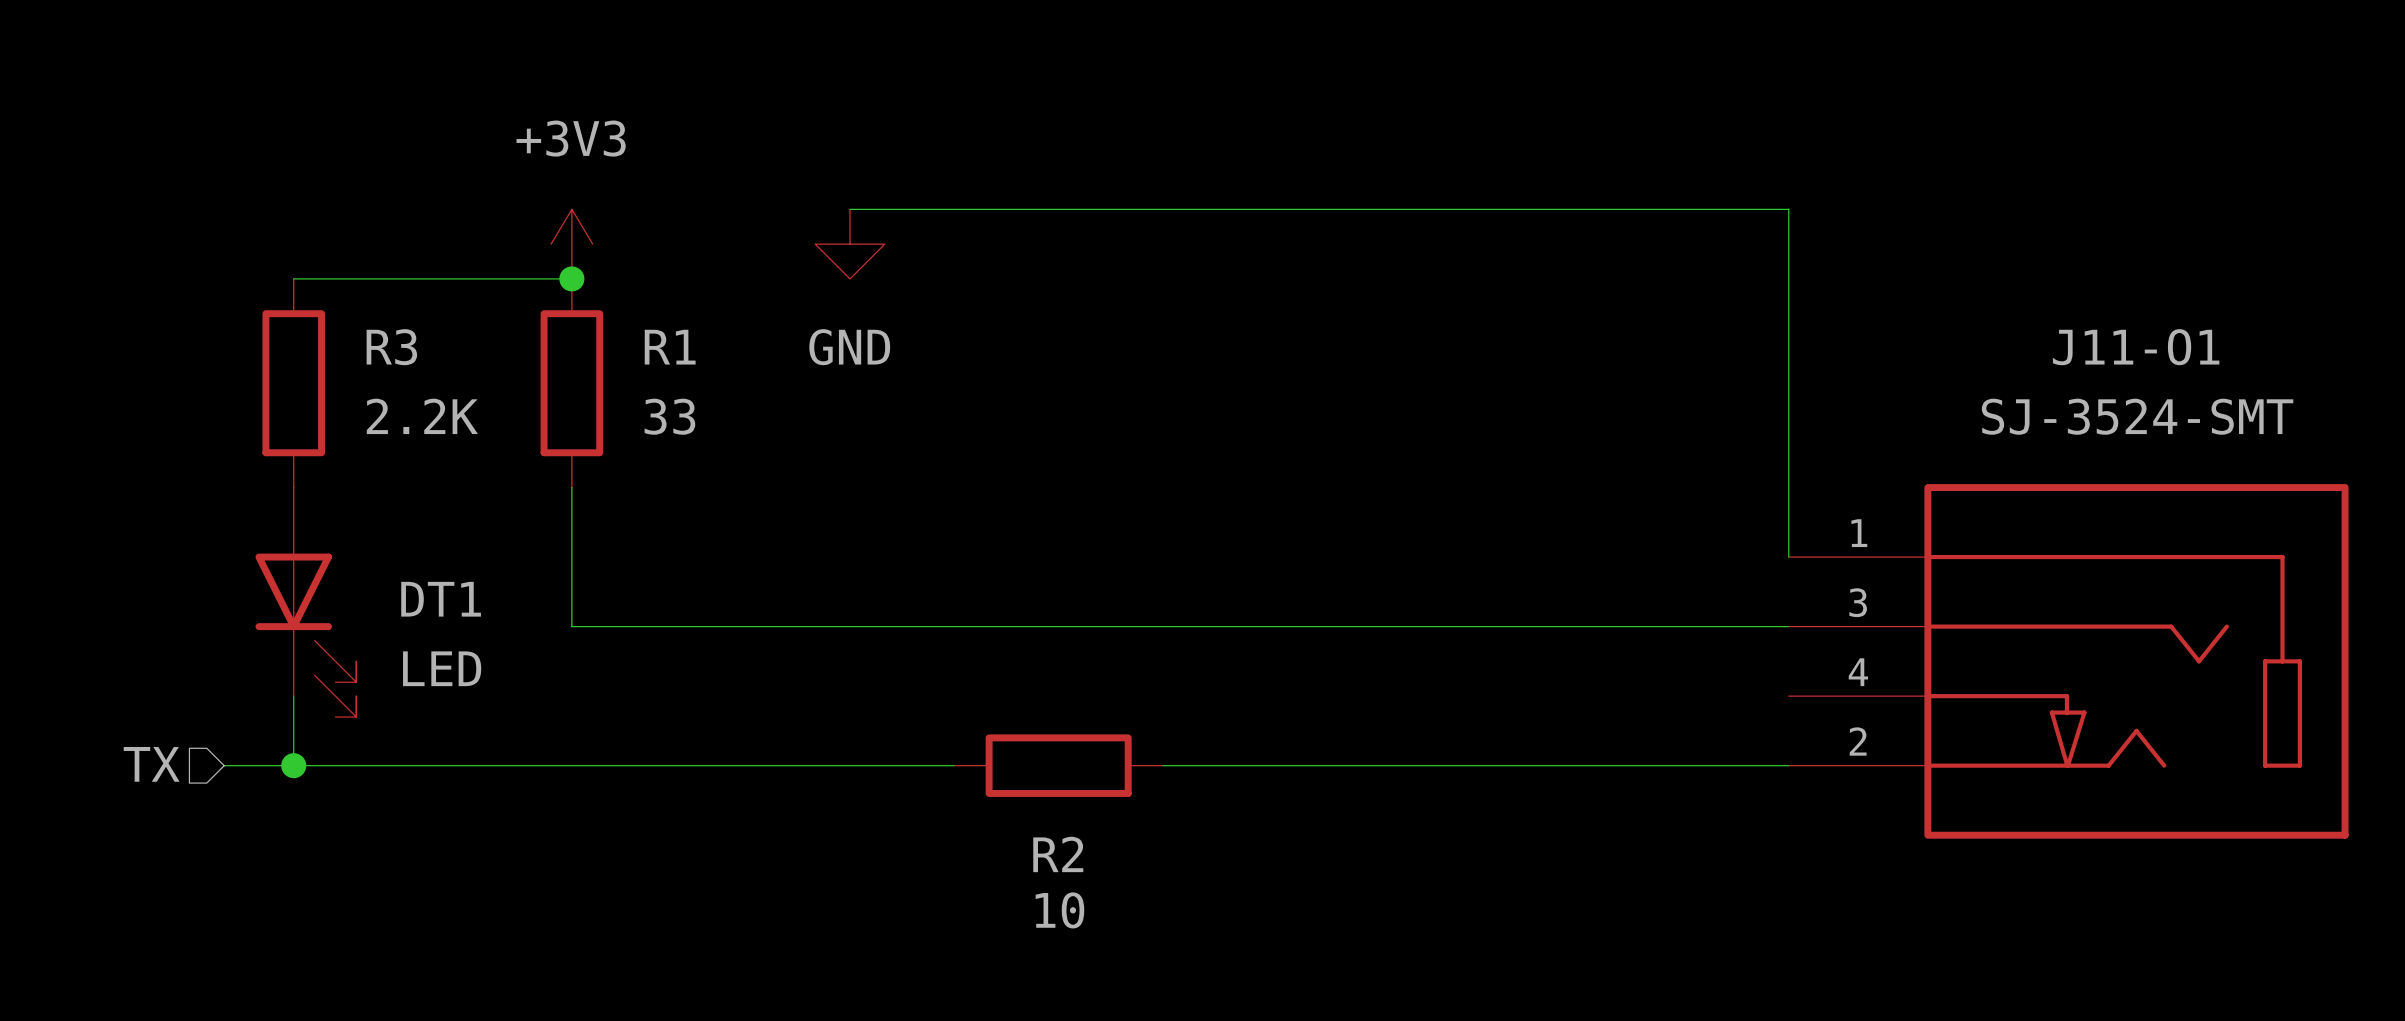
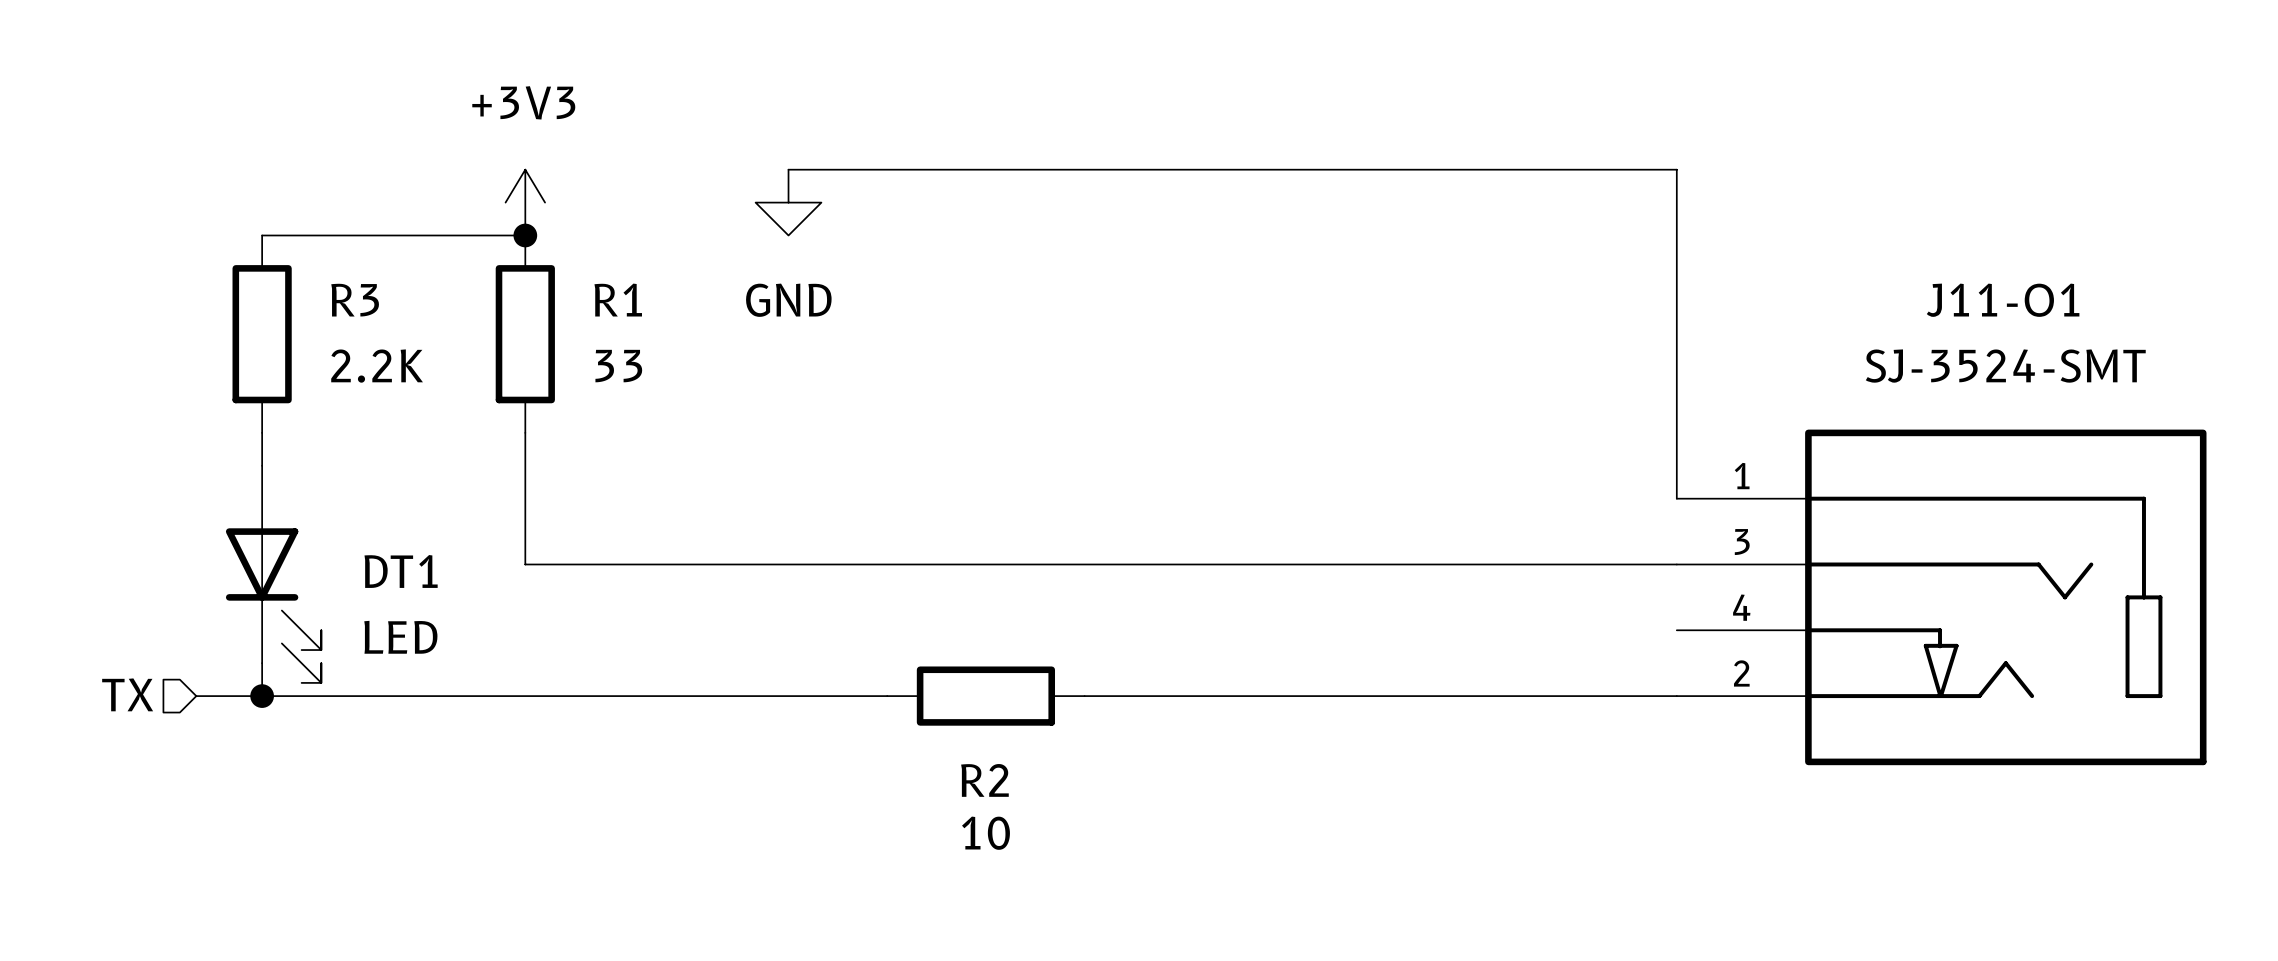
DT1 position: (305, 602) -> (273, 574)

